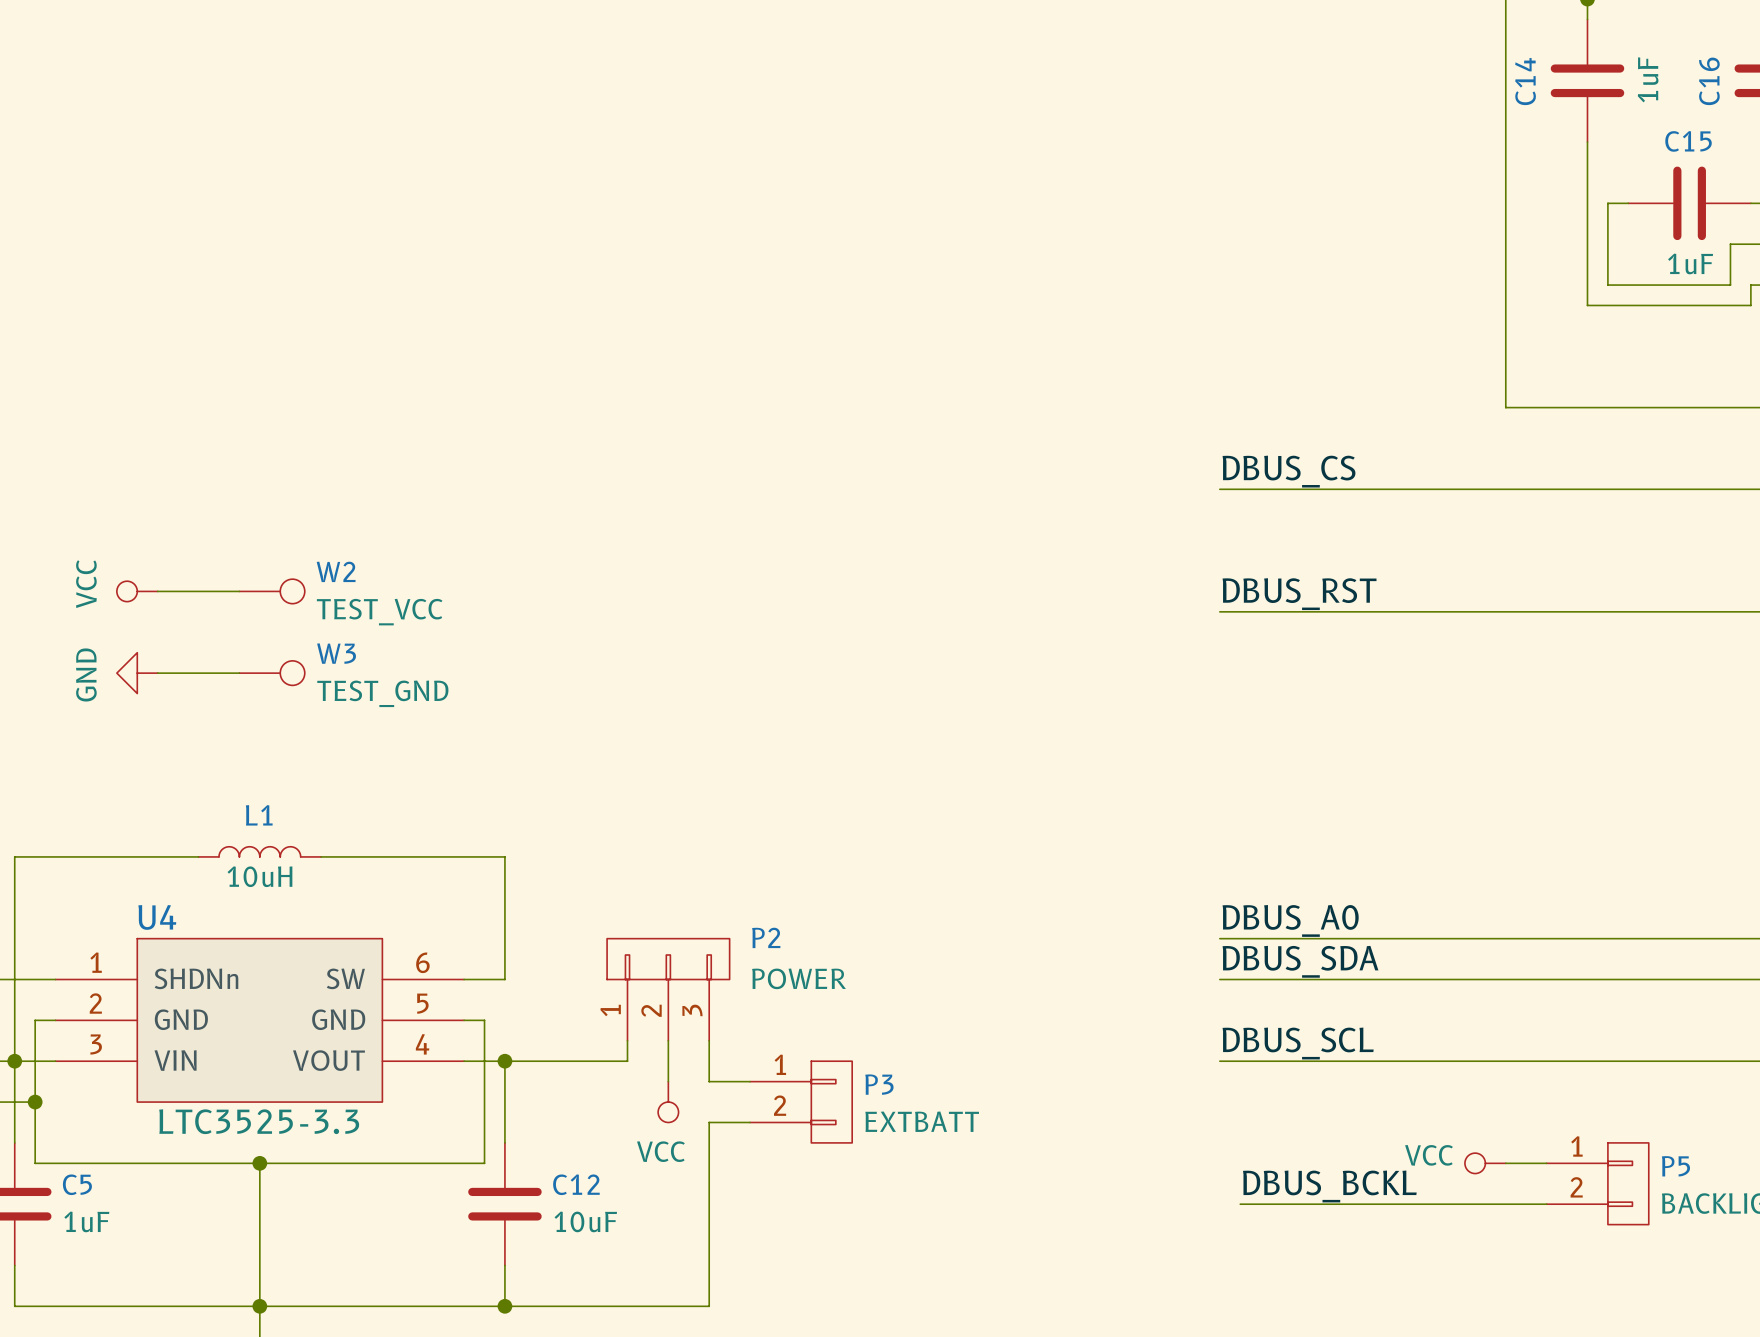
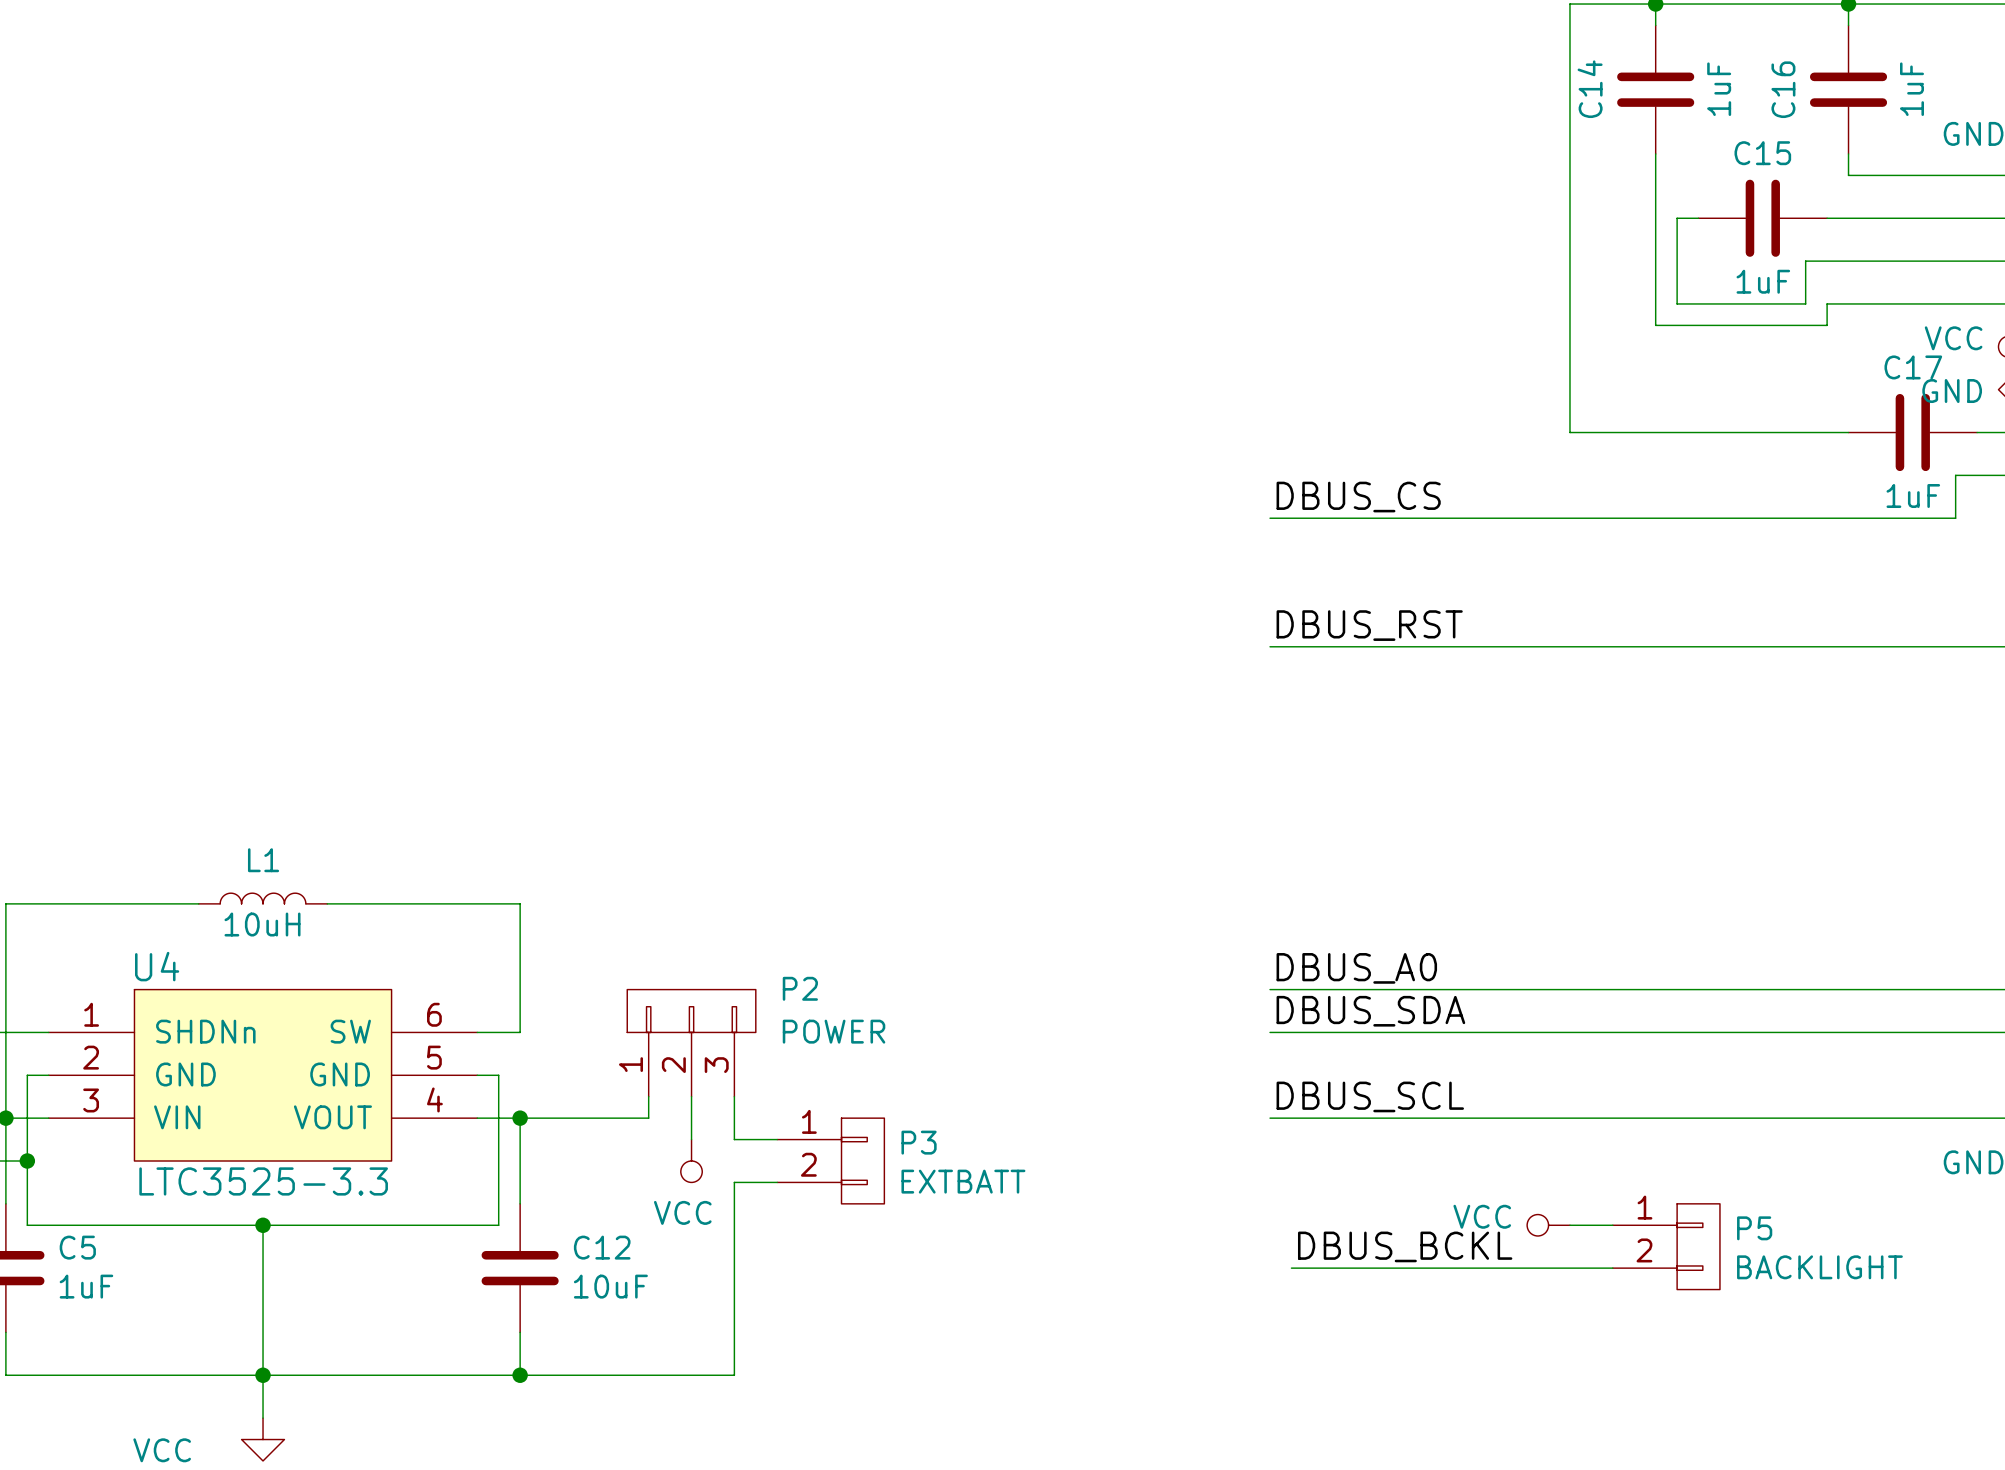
power symbol: VCC (137, 591) -> none
wire: (157, 591) (239, 591) -> none
W2: TEST_VCC (272, 591) -> none
power symbol: GND (137, 673) -> none
wire: (157, 673) (239, 673) -> none
W3: TEST_GND (272, 673) -> none

